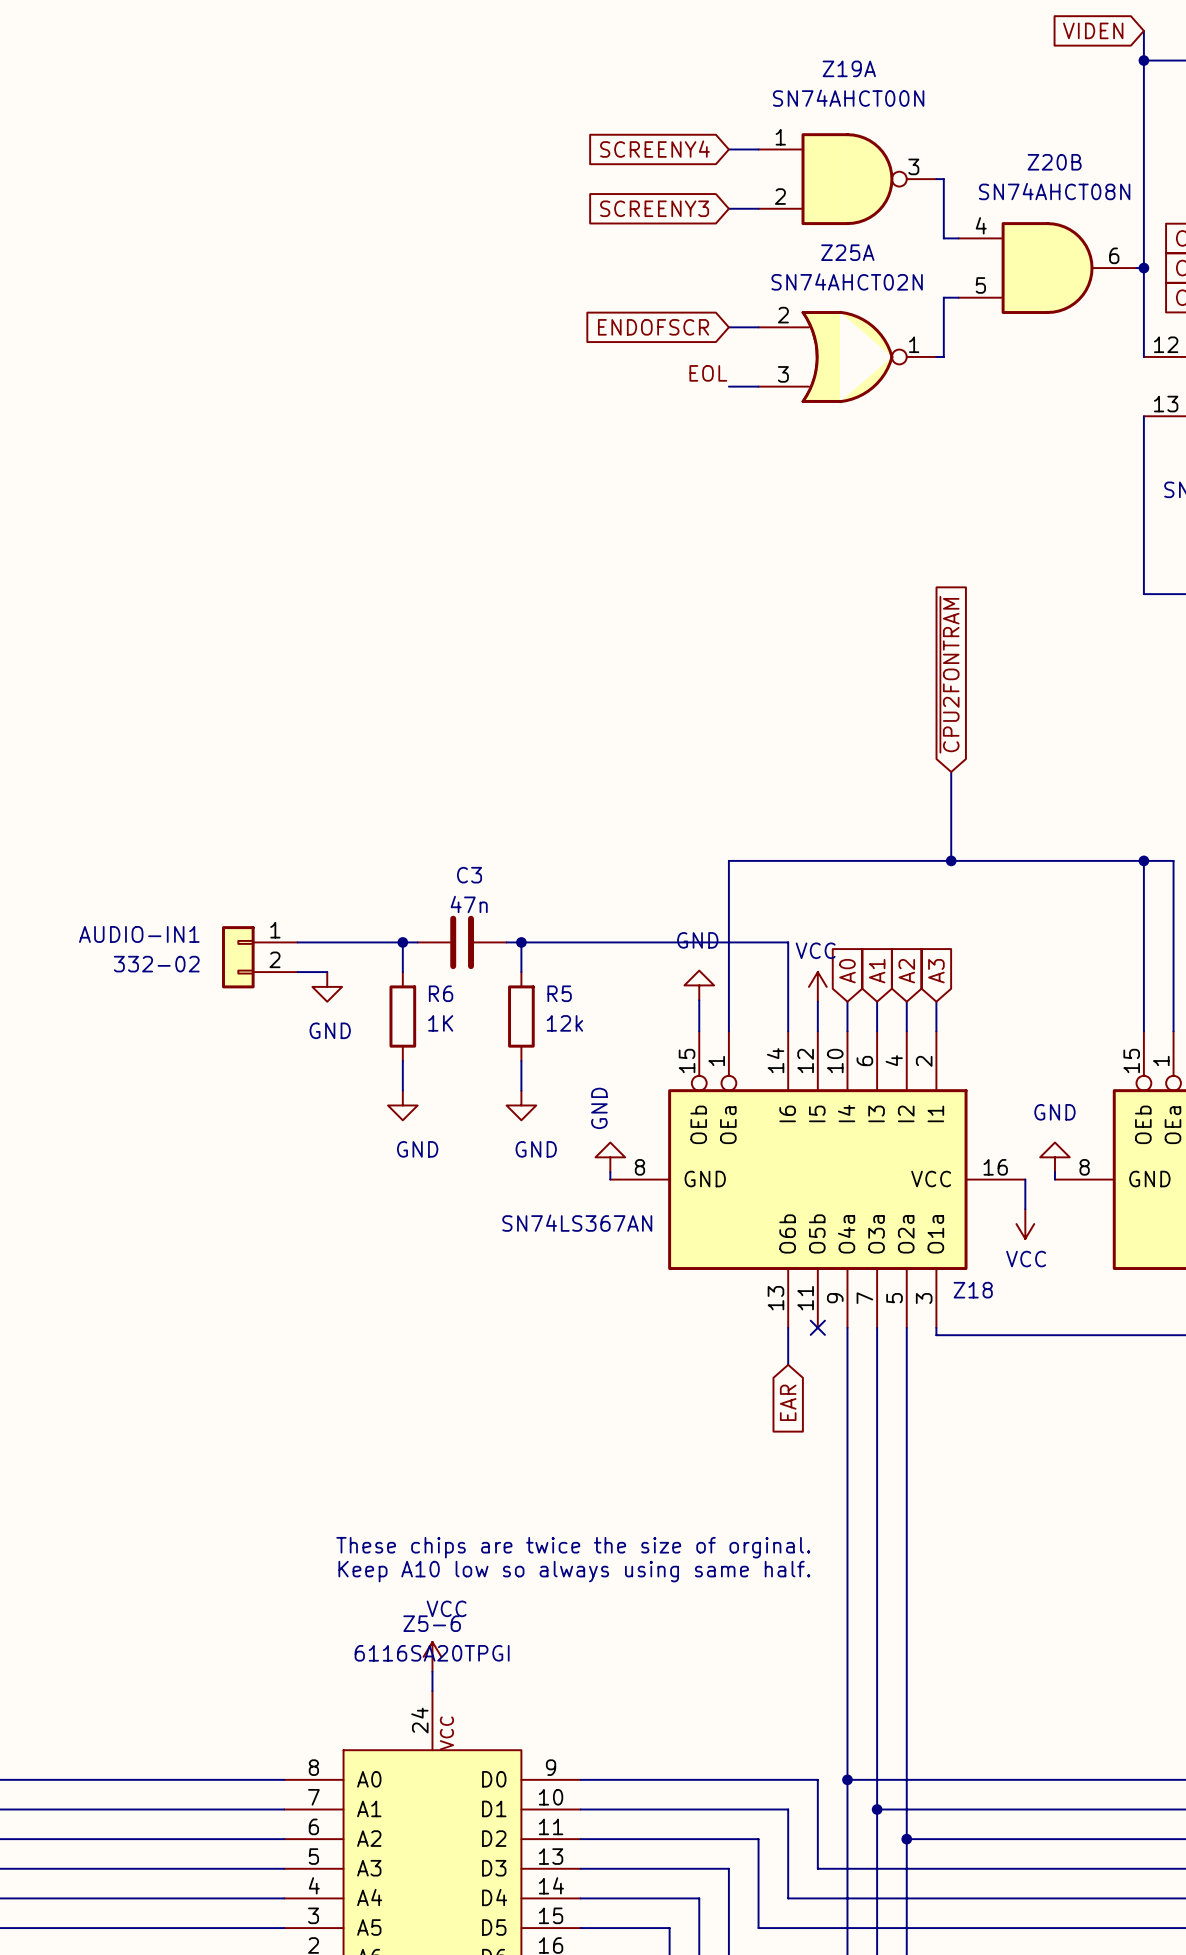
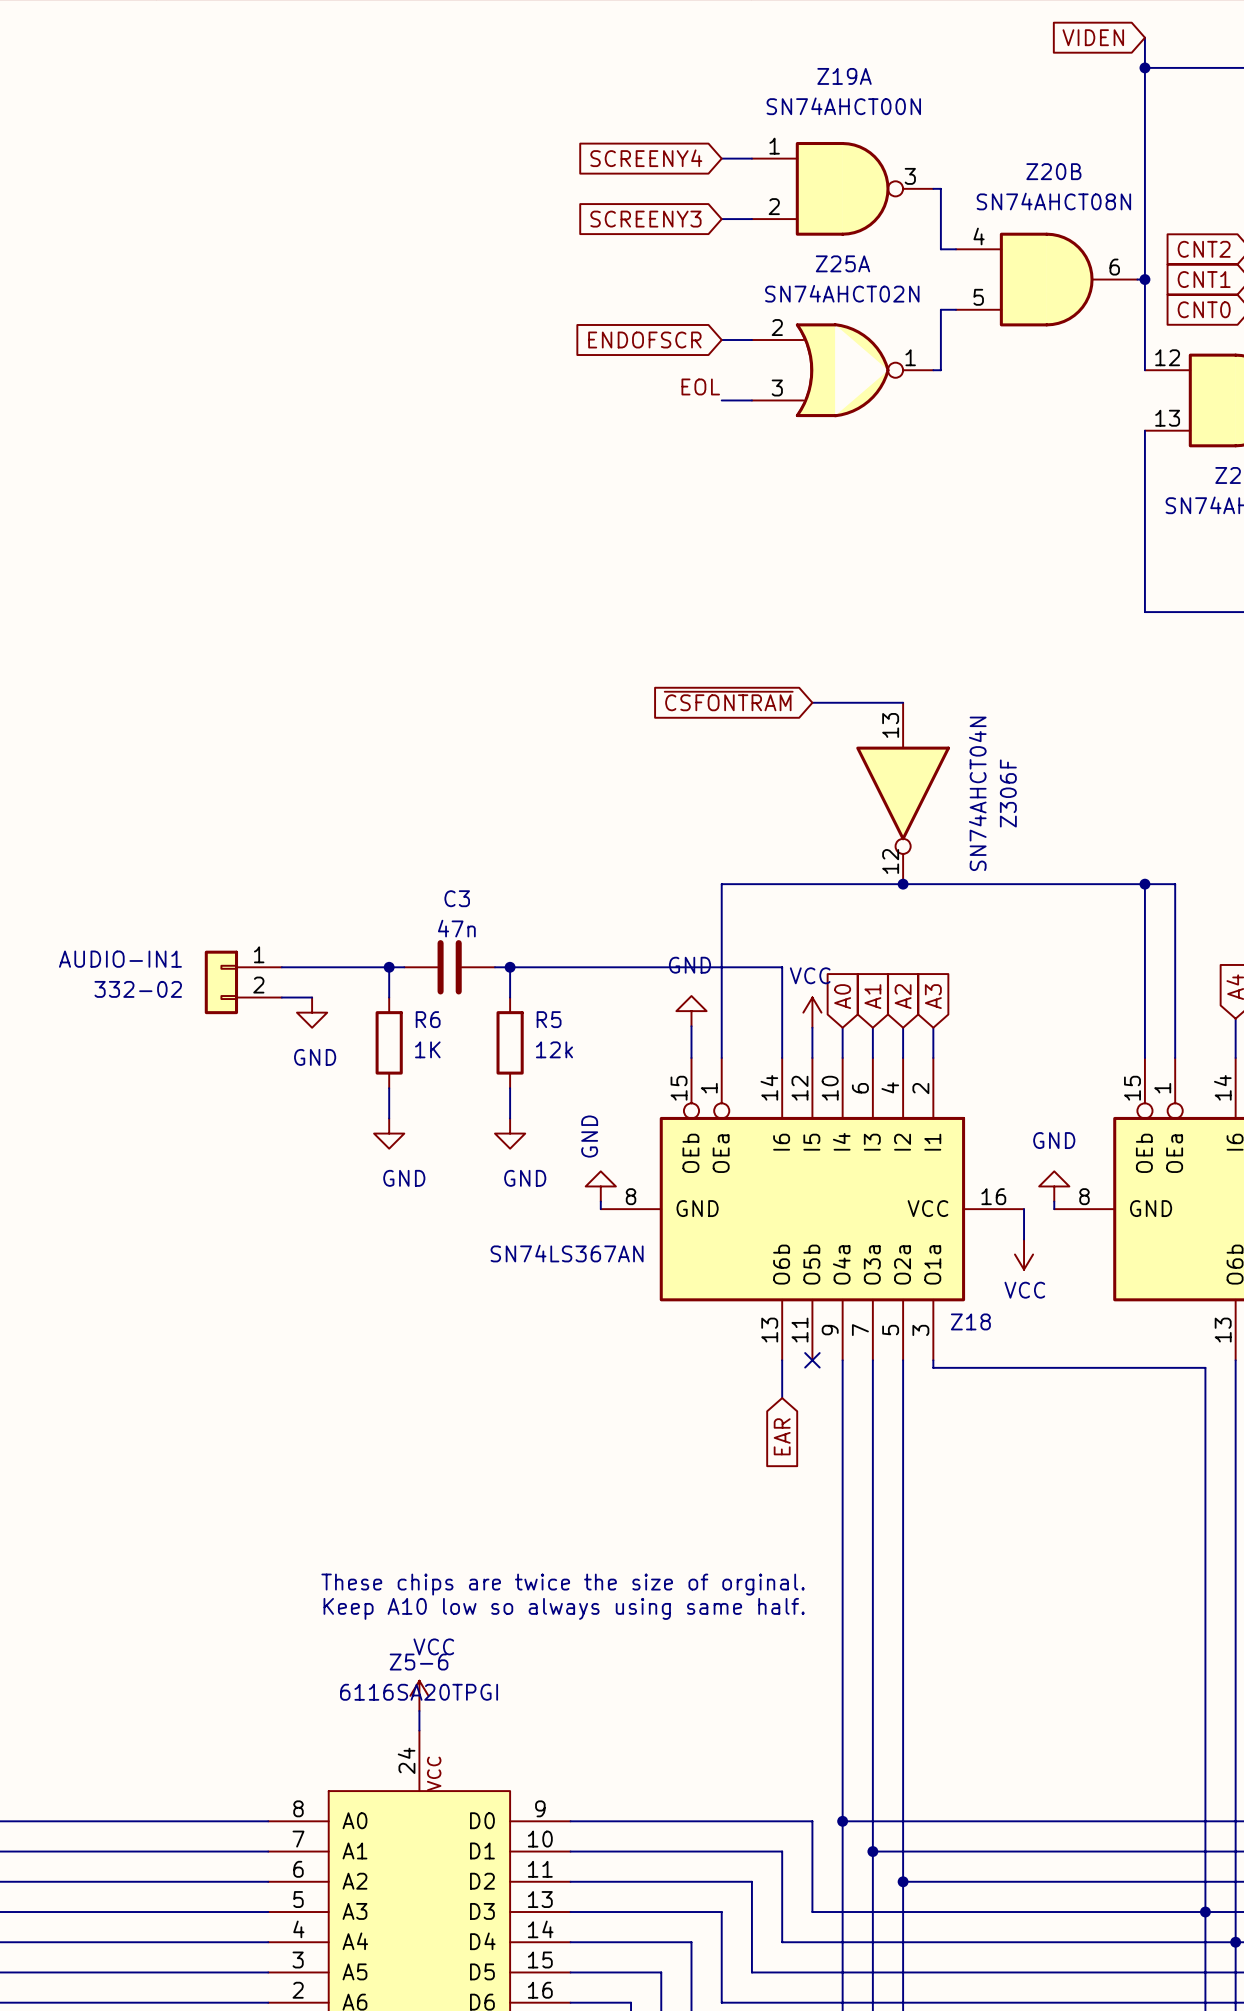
global label: ~{CPU2FONTRAM} (949, 674) -> none
global label: none -> ~{CSFONTRAM} (728, 701)
wire: none -> (812, 702) (903, 702)
Z306F: none -> SN74AHCT04N (903, 793)
wire: (951, 771) (951, 860) -> none
junction position: (951, 860) -> (903, 884)

